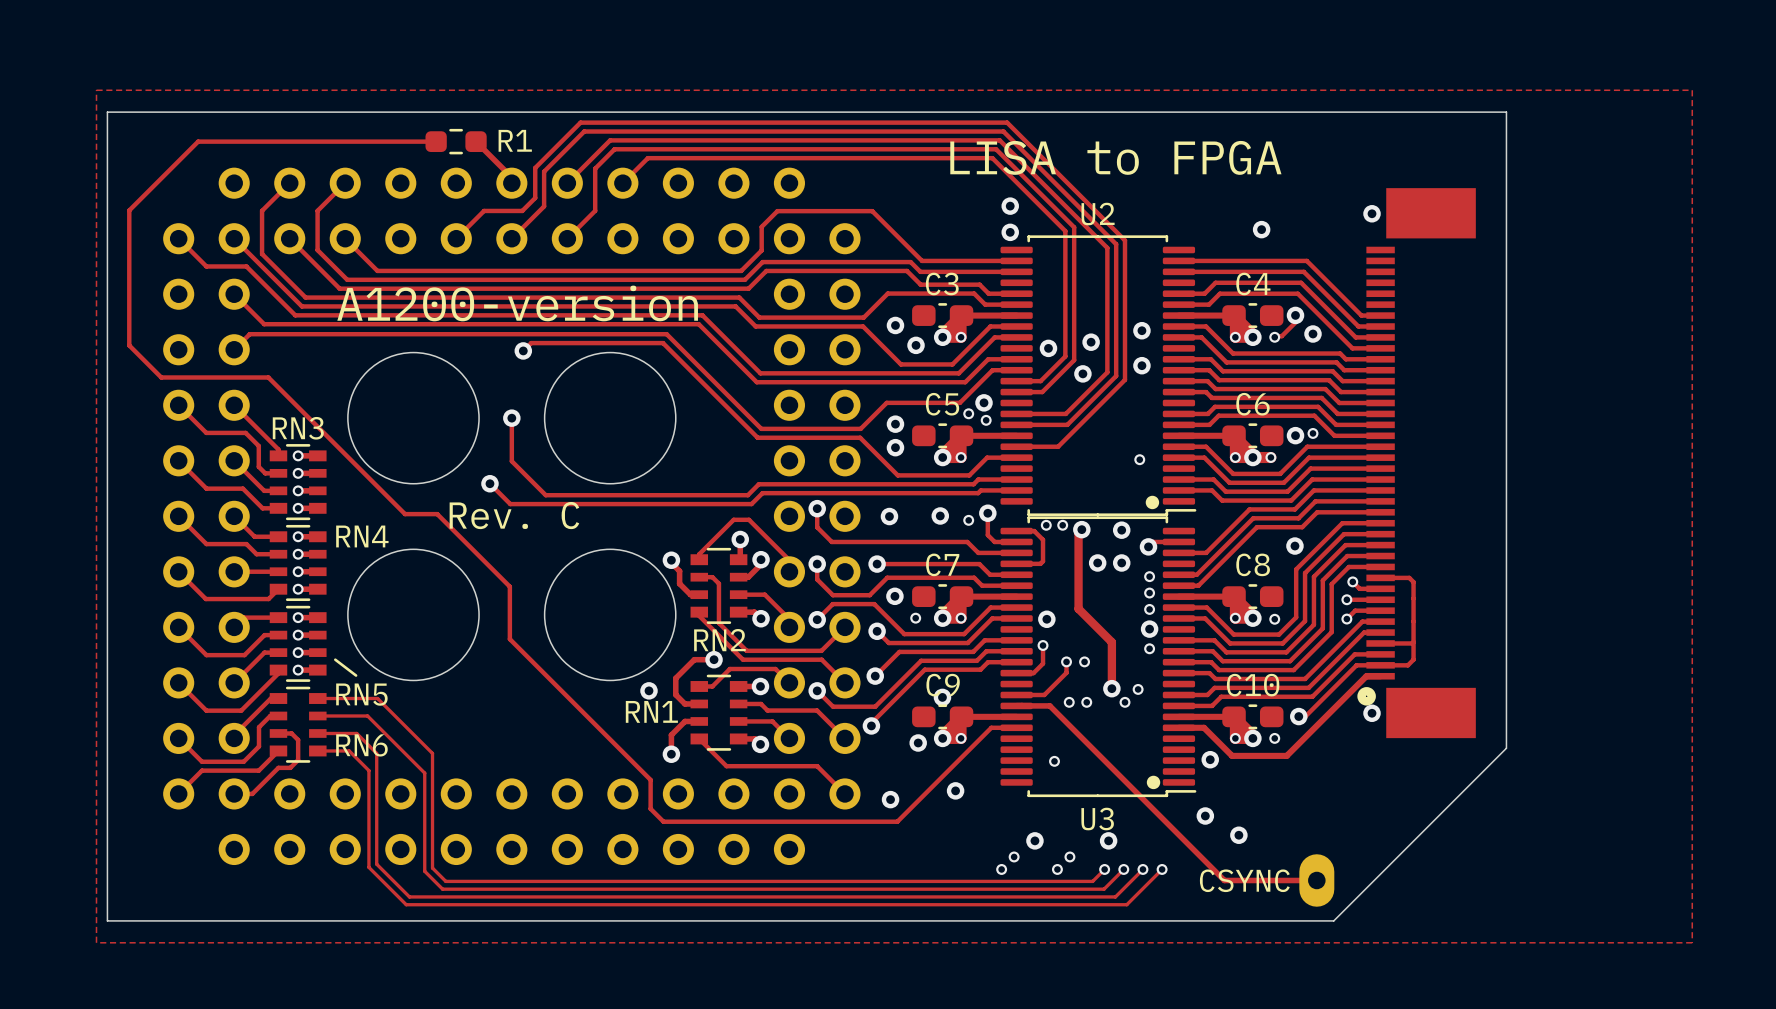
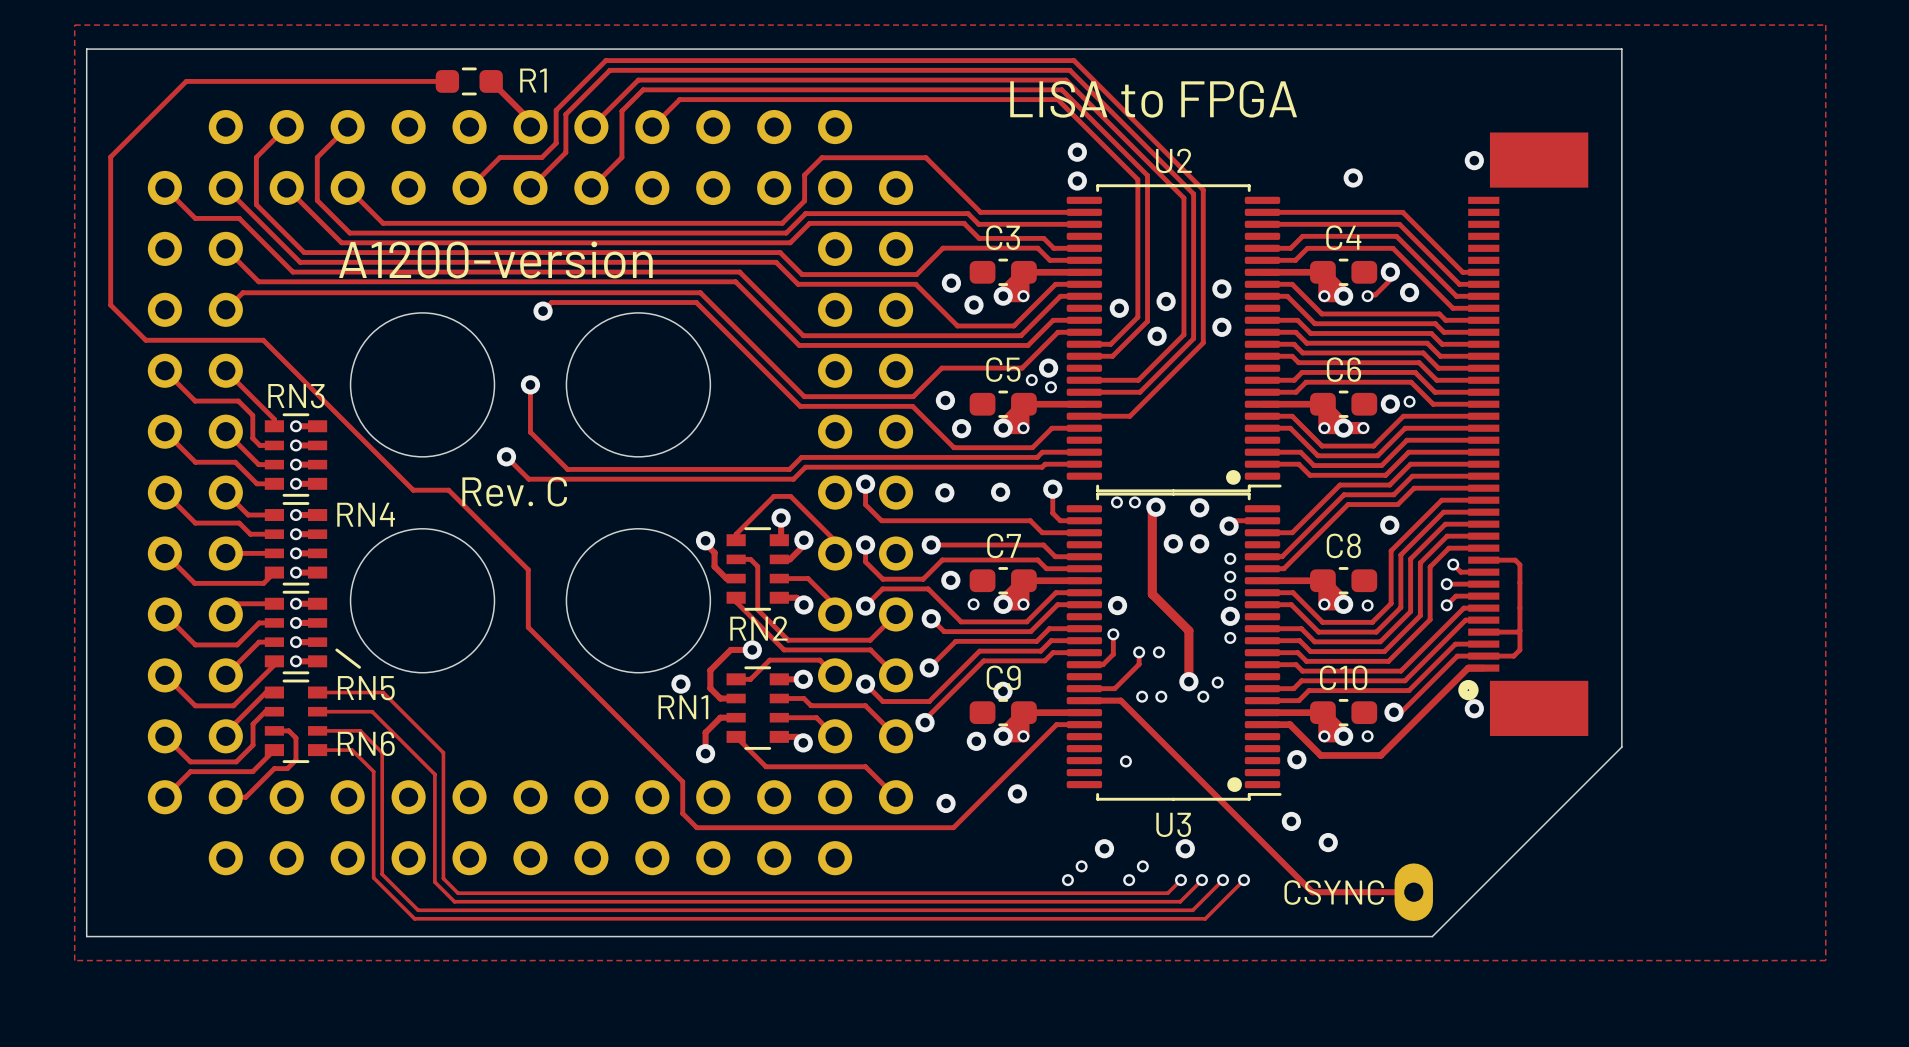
via: (895, 424) -> none
via: none -> (945, 400)
via: (895, 447) -> none
via: none -> (961, 428)
via: (1139, 459) -> none
via: (968, 520) -> none
track: (1016, 531) (1034, 531) (1043, 539) (1043, 561) (1040, 563) (1016, 563) -> none

